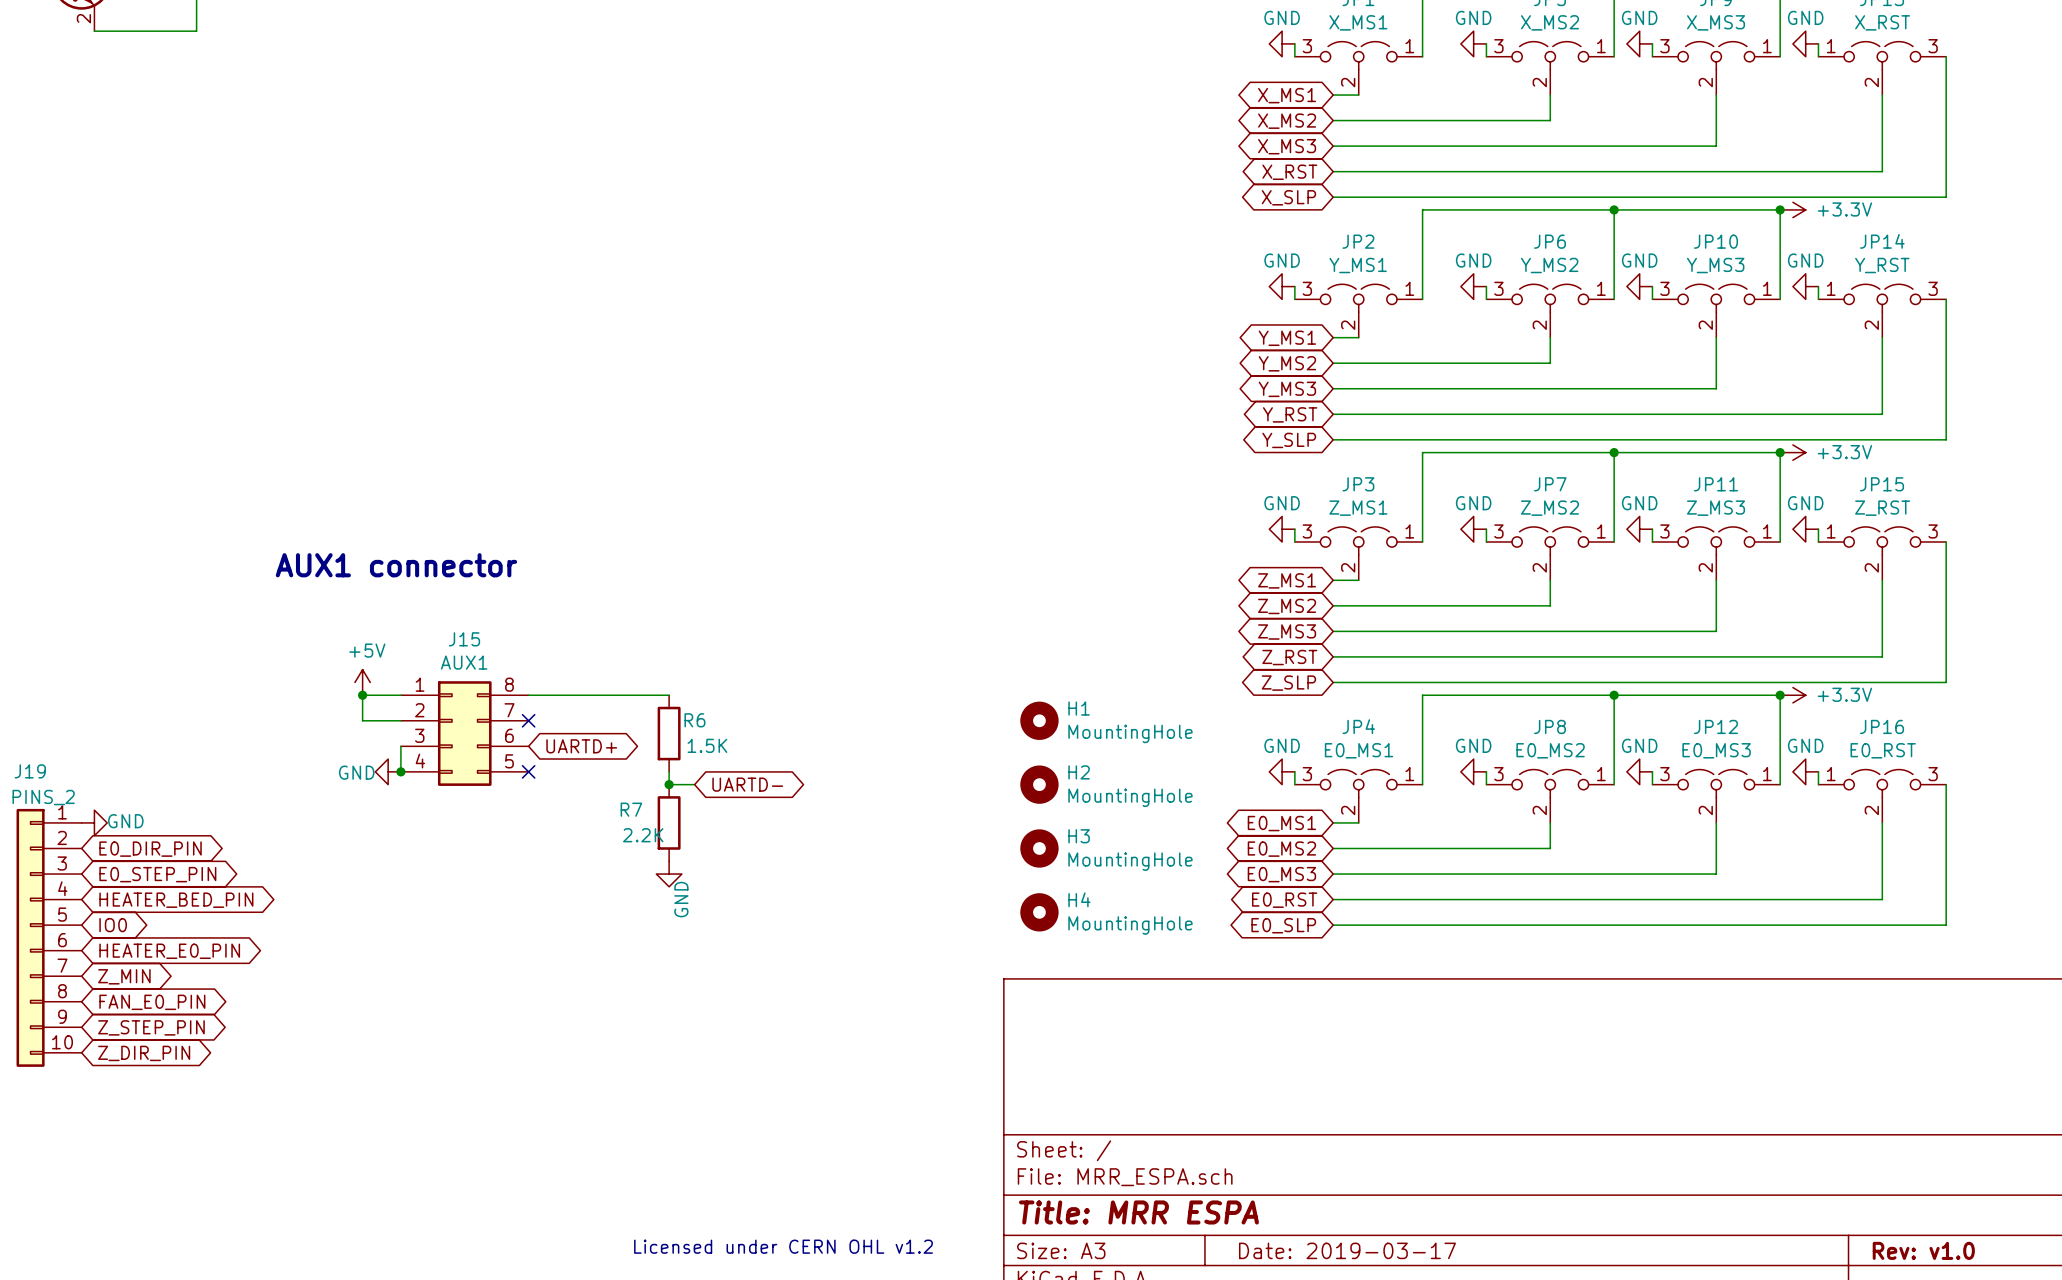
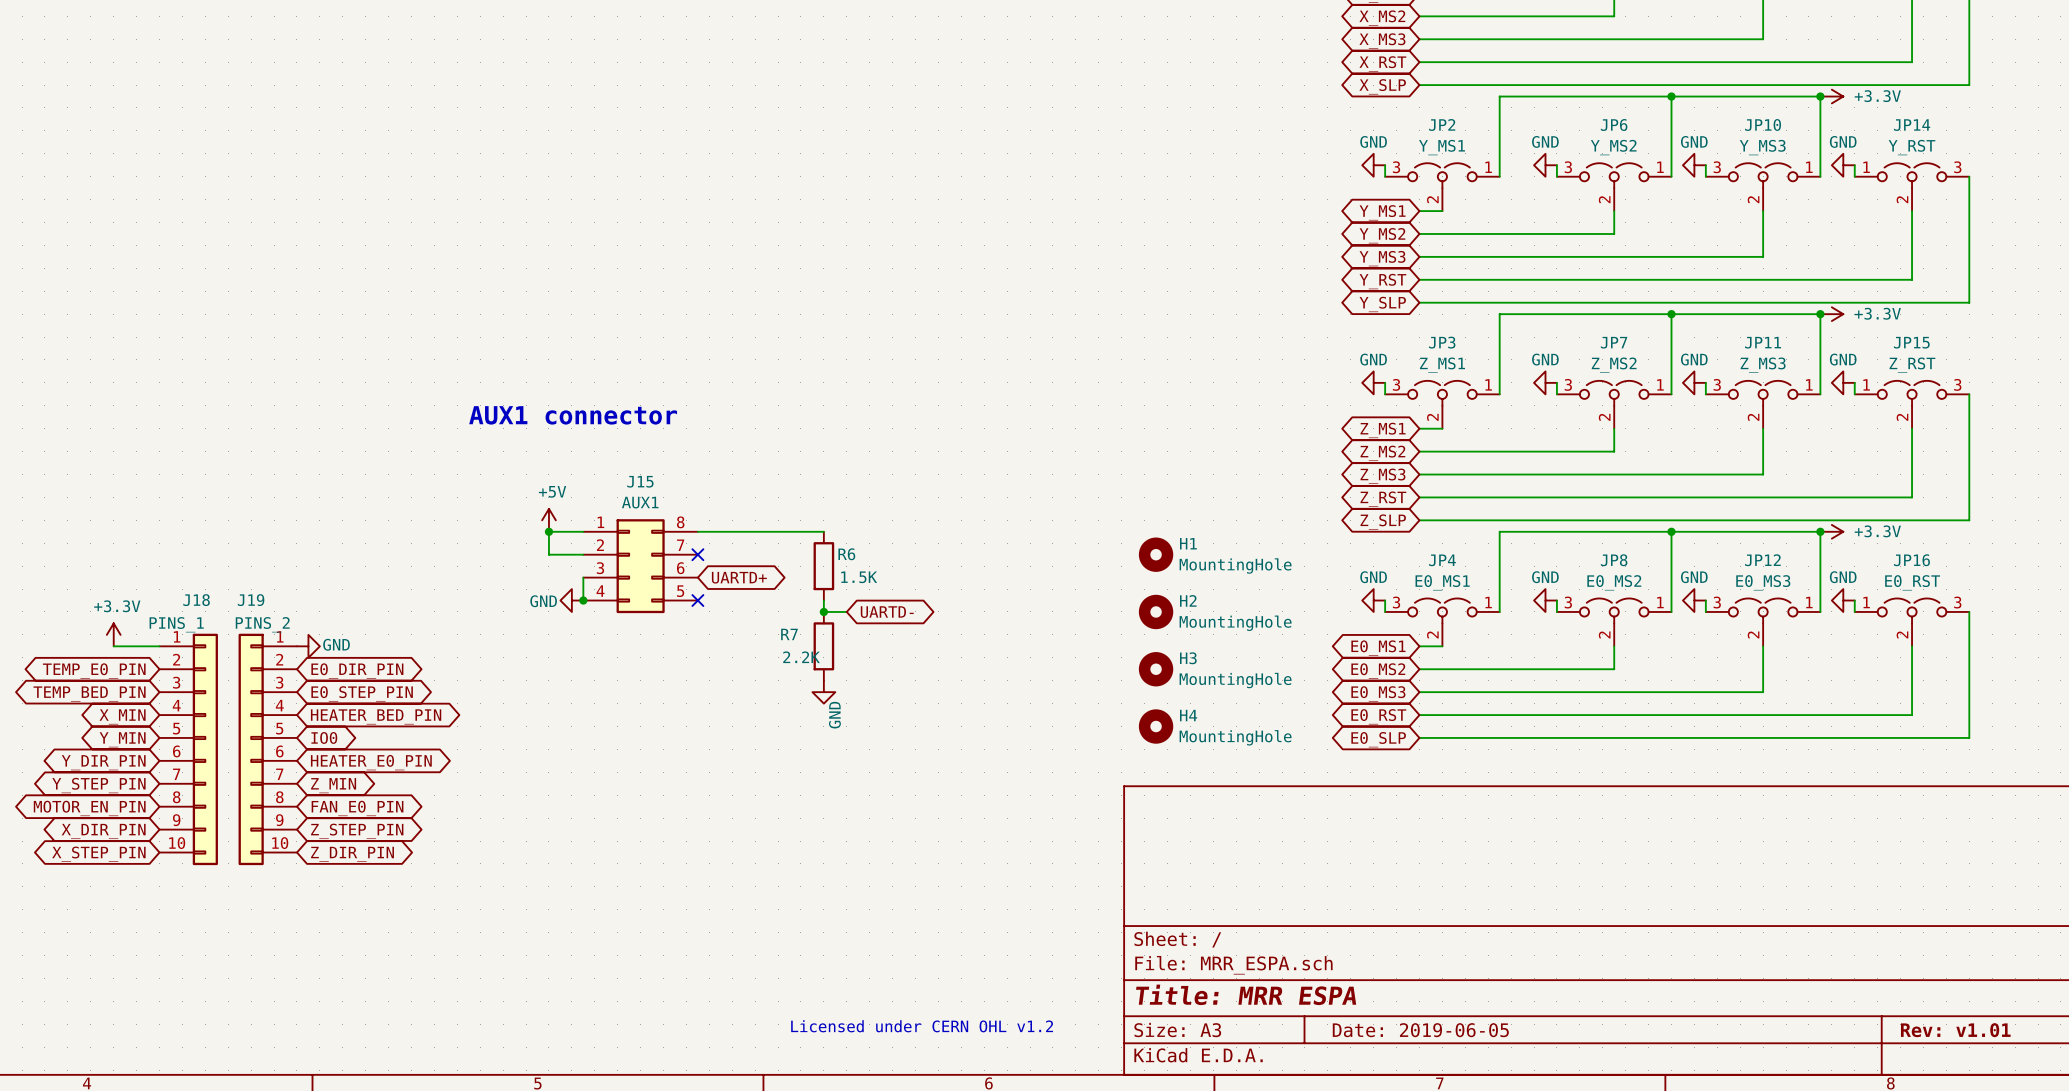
title block: Date: 2019-03-17 (1347, 1250) -> Date: 2019-06-05 (1420, 1030)
title block: Rev: v1.0 (1923, 1250) -> Rev: v1.01 (1955, 1030)

